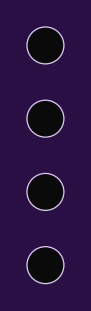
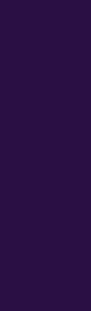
part: (45, 45) -> none
part: (45, 118) -> none
part: (45, 191) -> none
part: (45, 265) -> none

